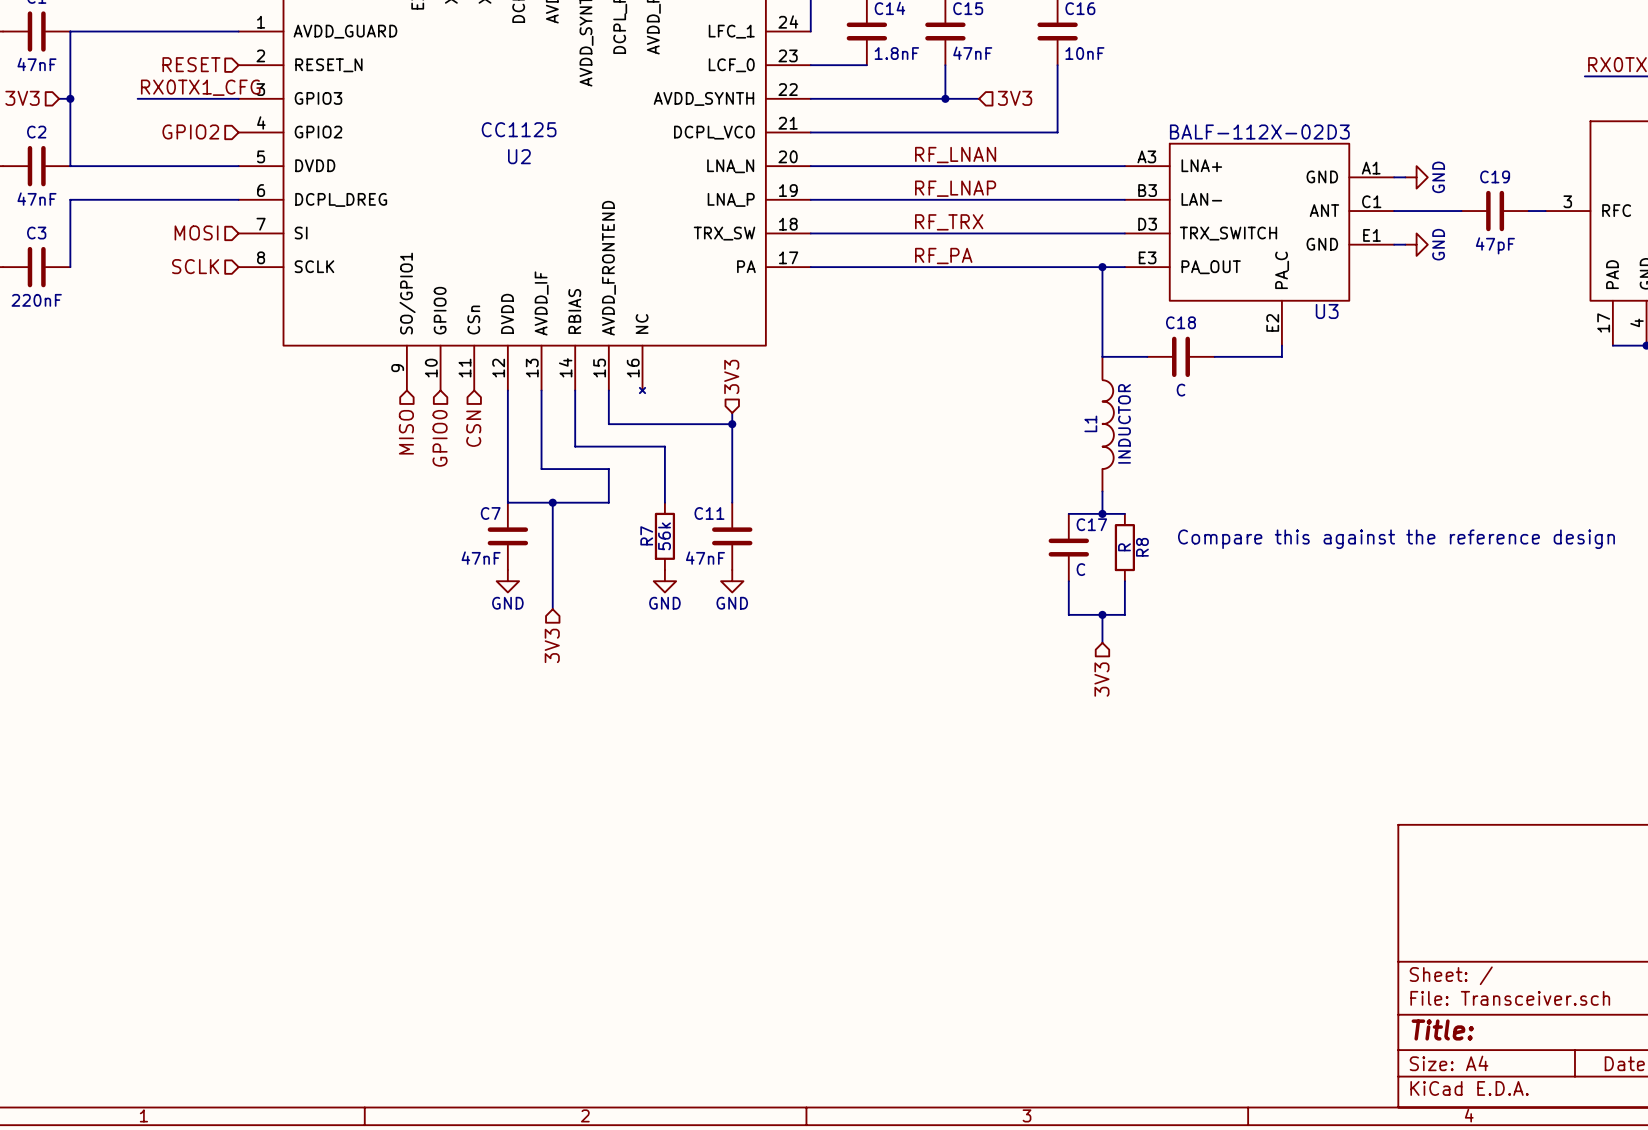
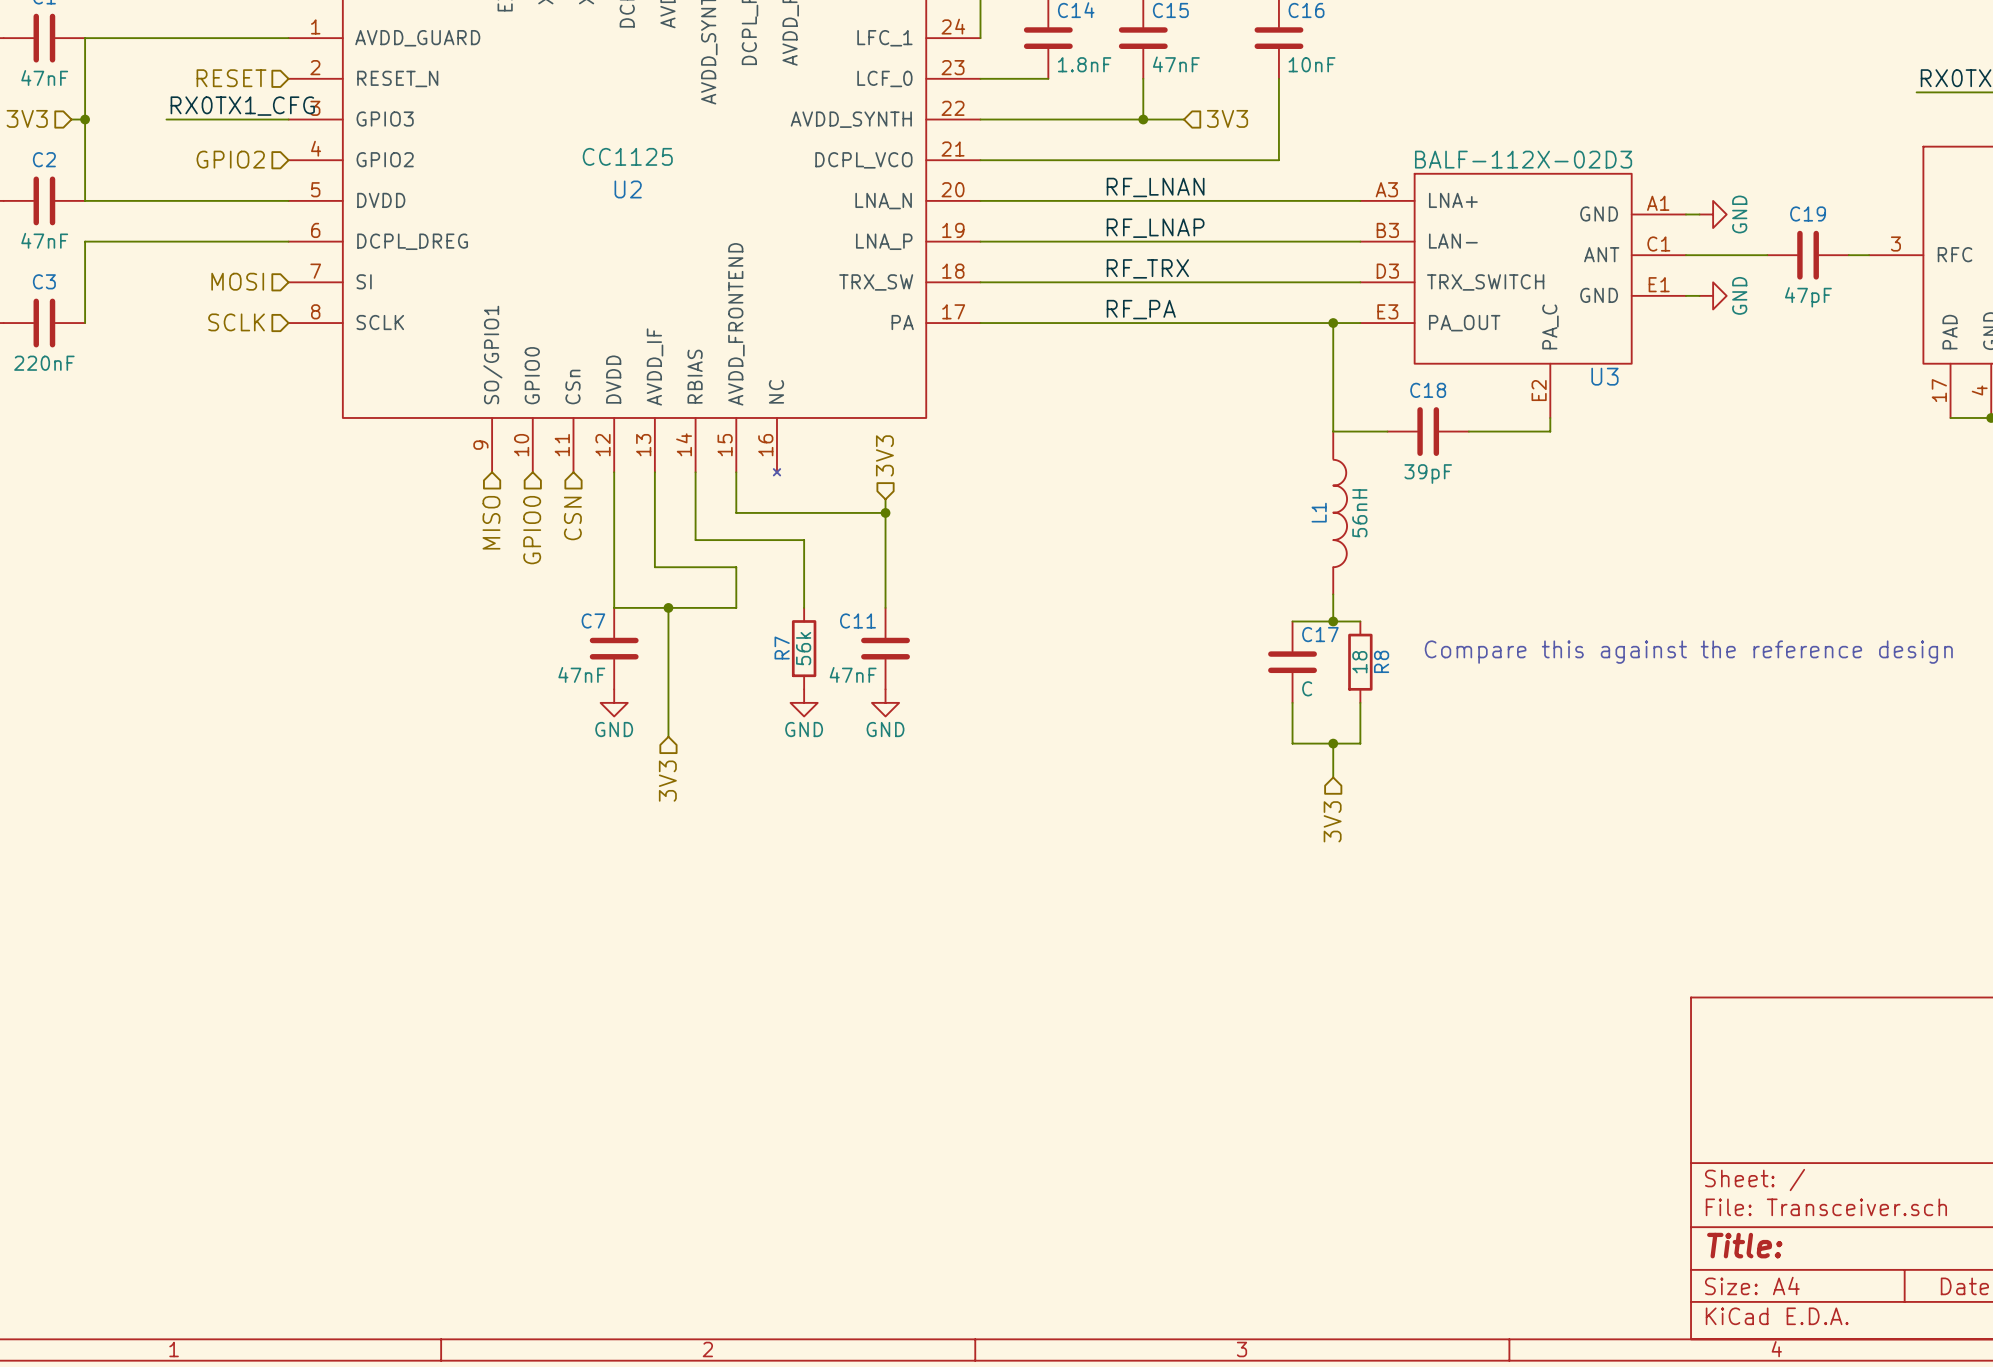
C18 value: C (1180, 390) -> 39pF (1428, 474)
L1 value: INDUCTOR (1124, 423) -> 56nH (1359, 513)
R8 value: R (1124, 547) -> 18 (1359, 662)

